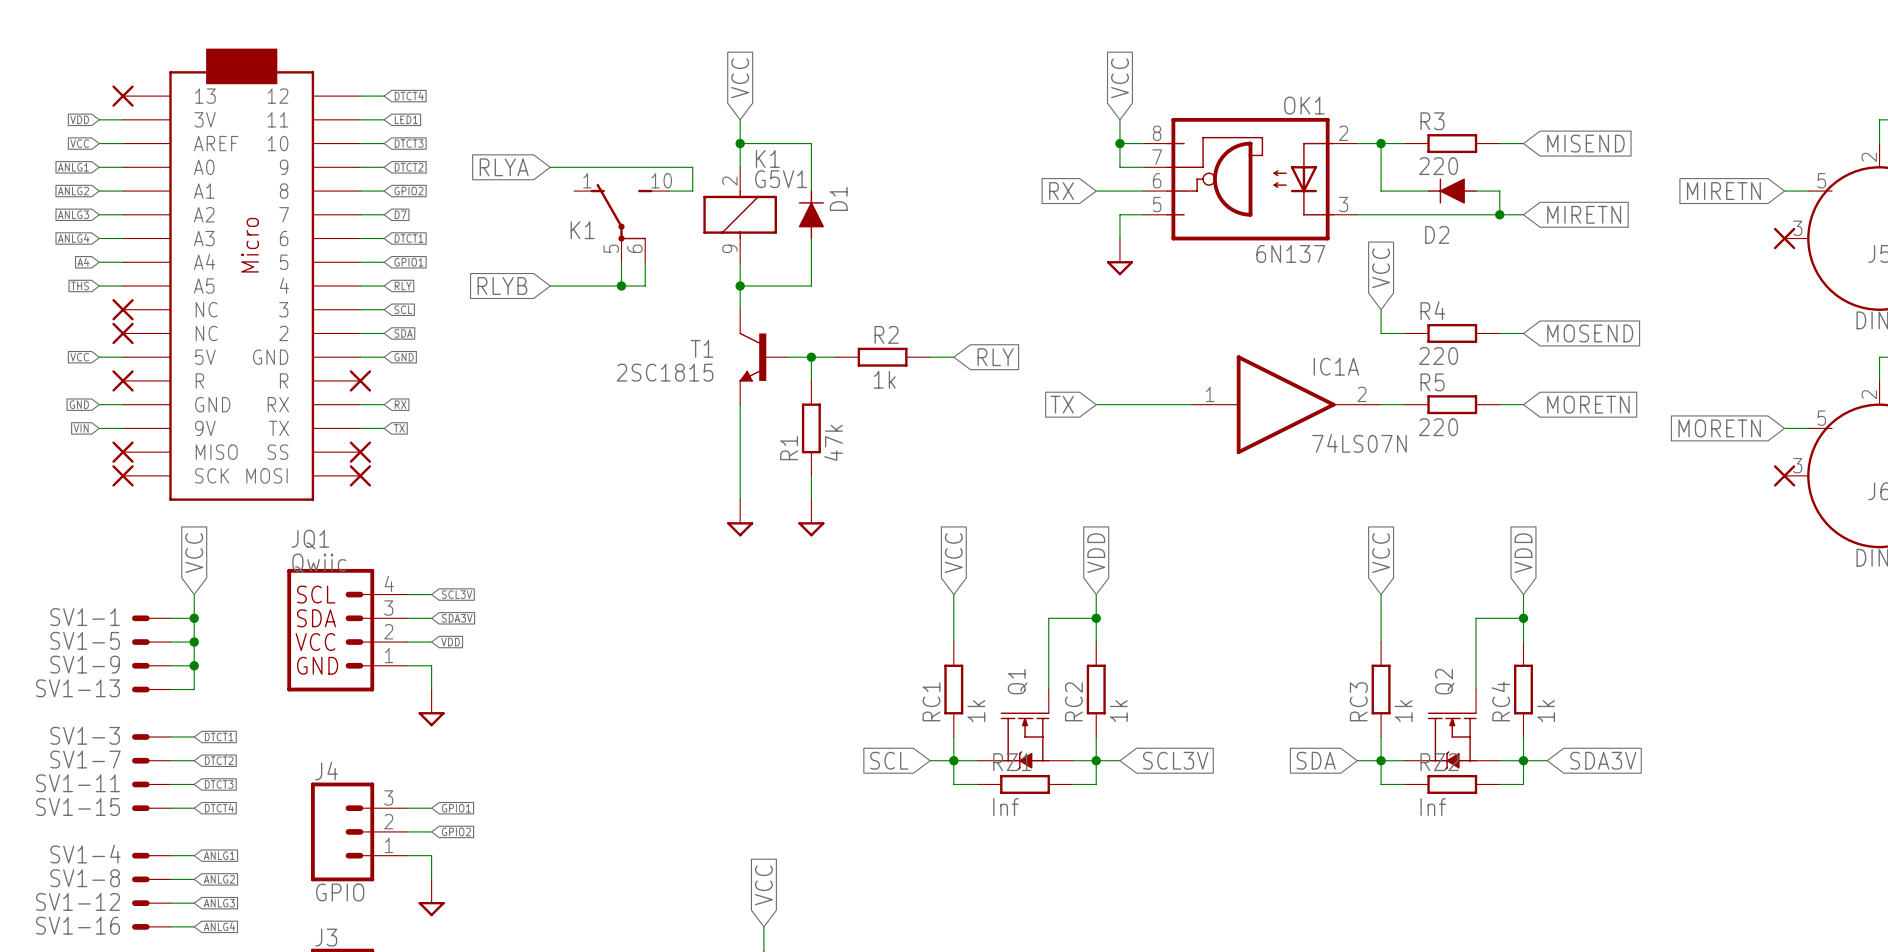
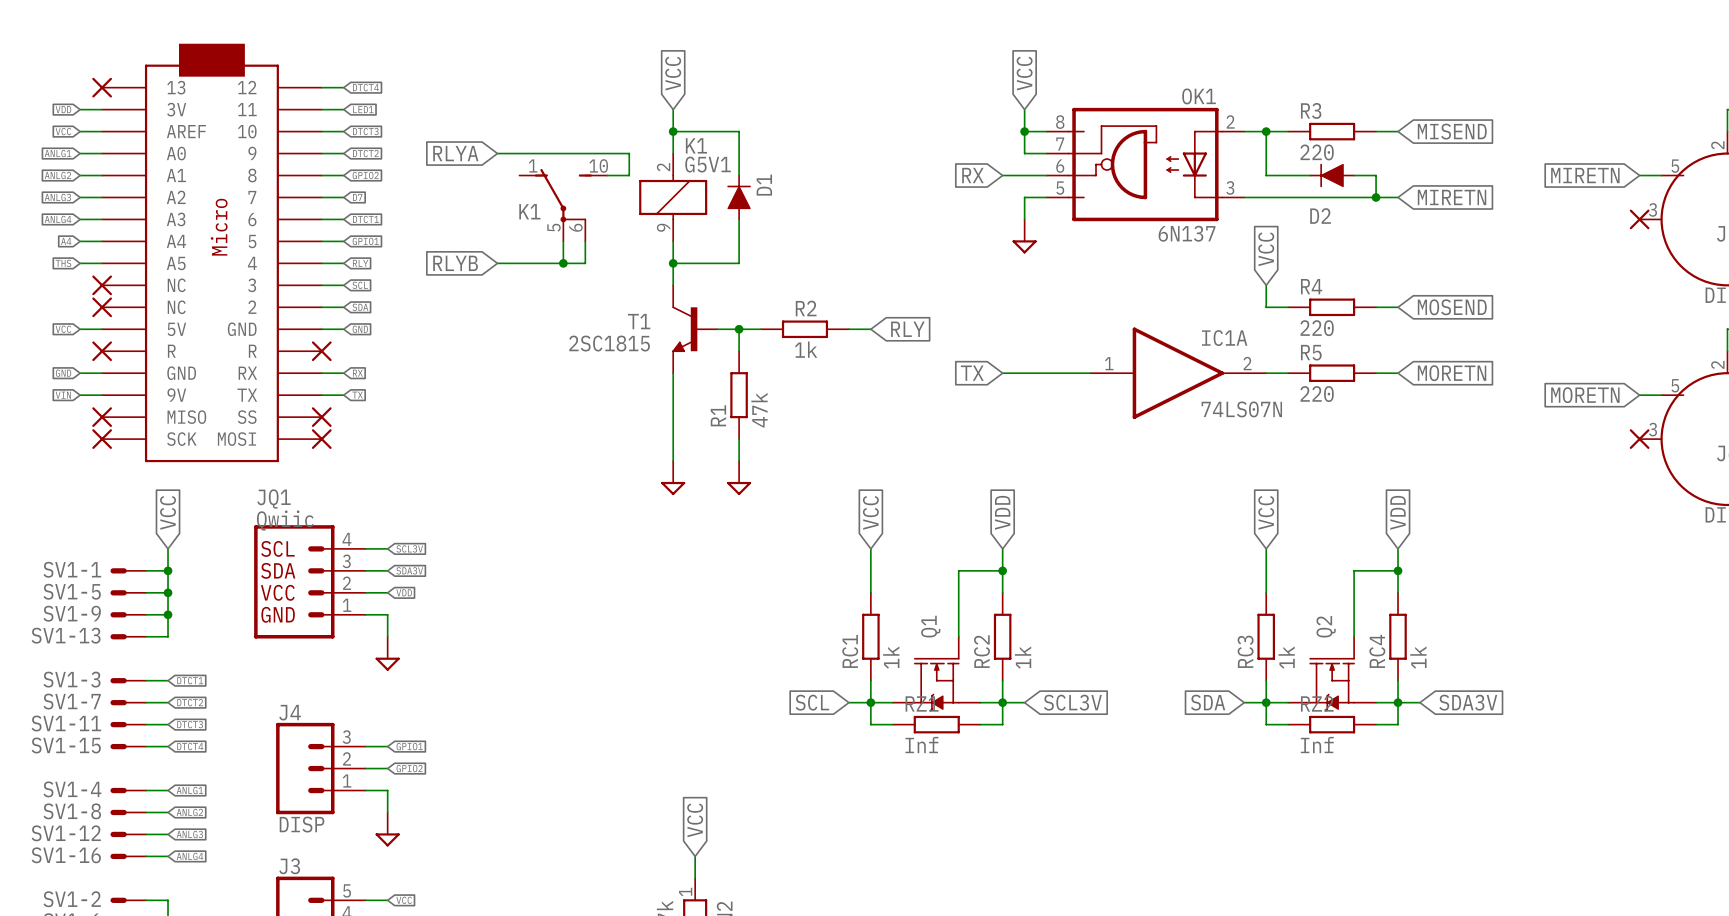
J4 value: GPIO (340, 892) -> DISP (302, 824)

